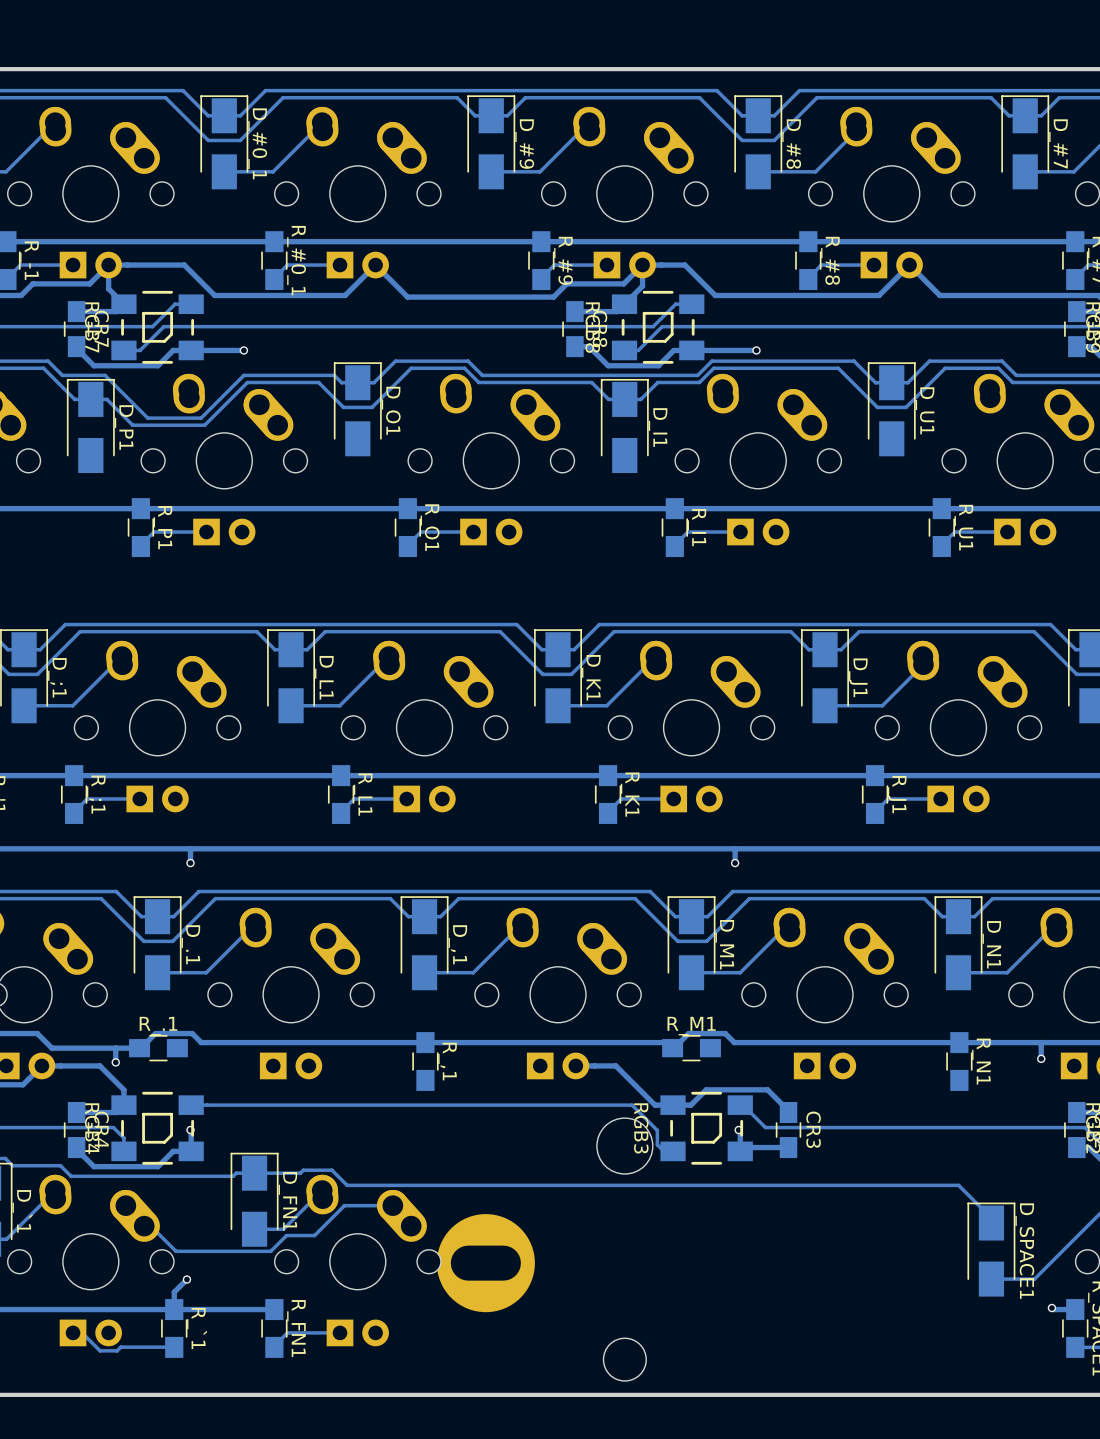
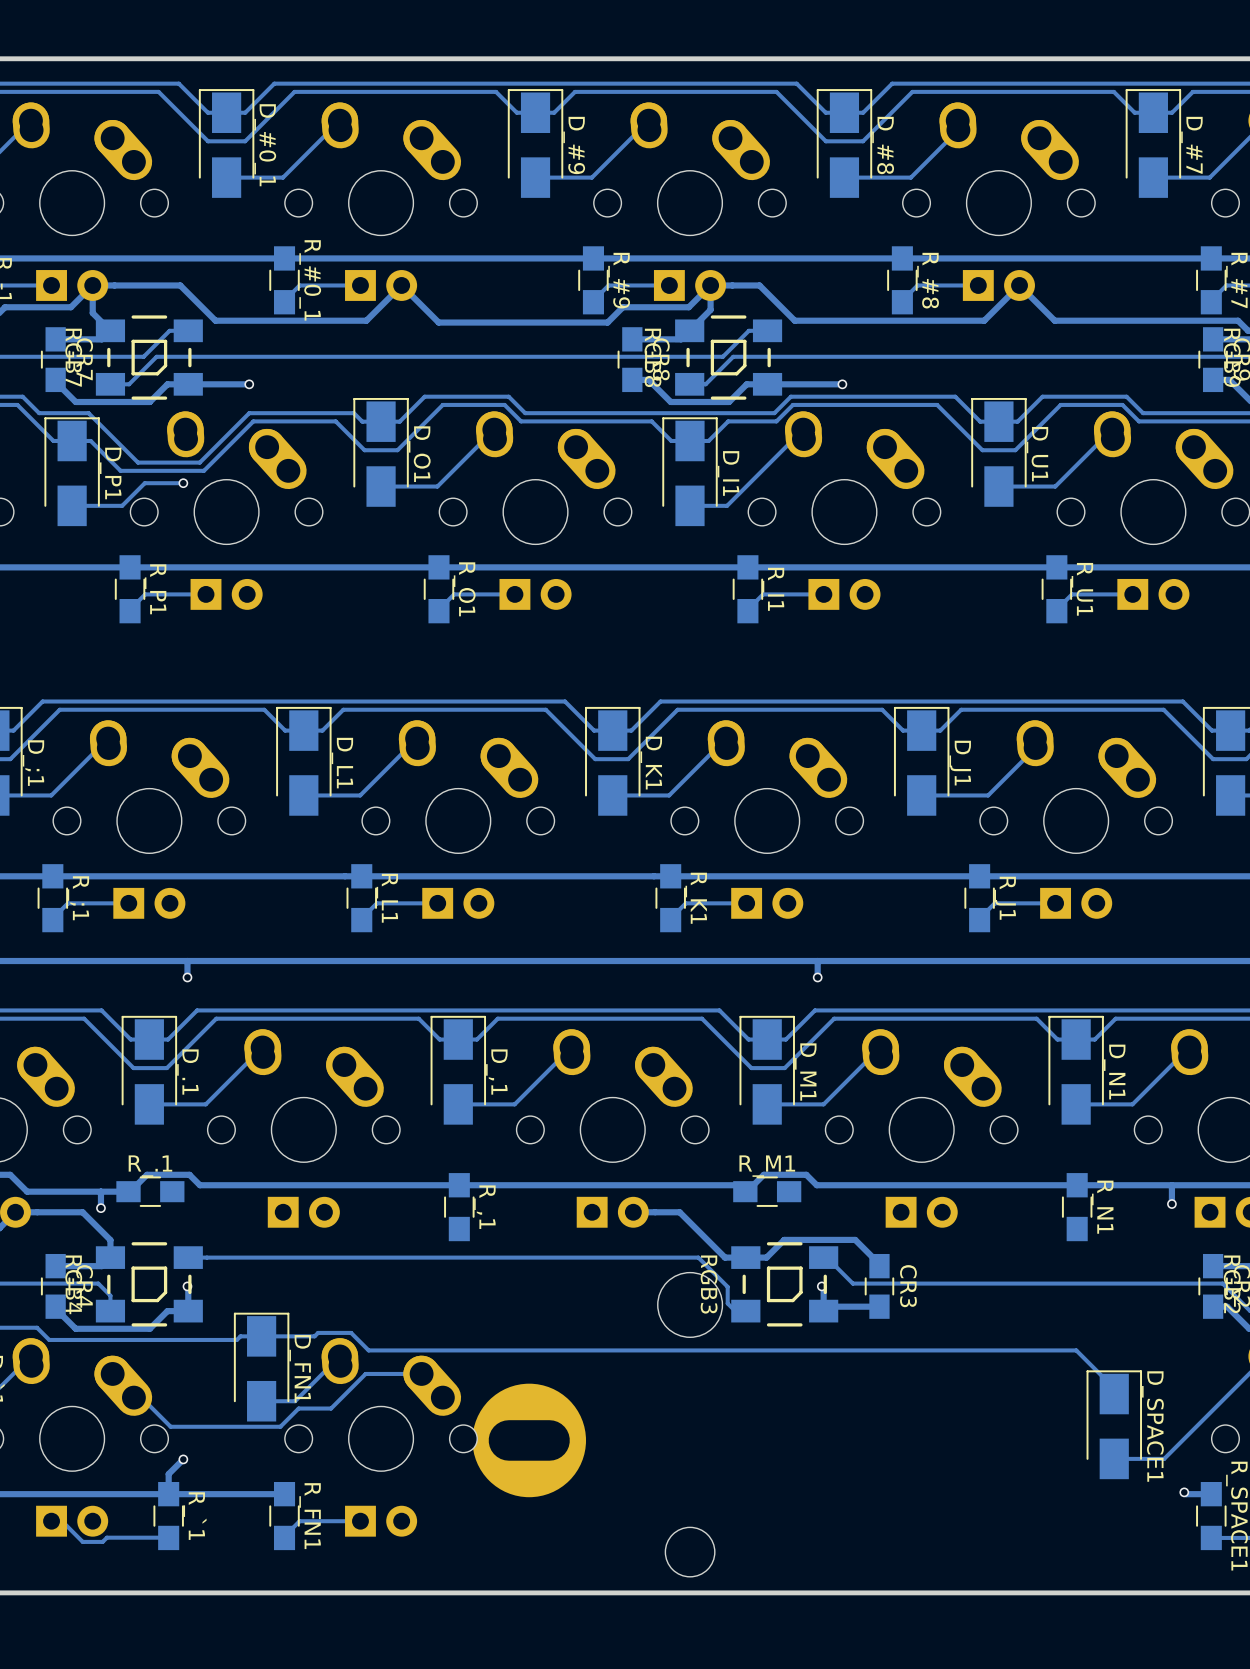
track: none -> (494, 429) (437, 486) (381, 486)
track: none -> (803, 429) (727, 505) (689, 505)
track: none -> (1112, 429) (1055, 486) (998, 486)
track: none -> (183, 483) (144, 483) (122, 505) (72, 505)
via: none -> (183, 483)

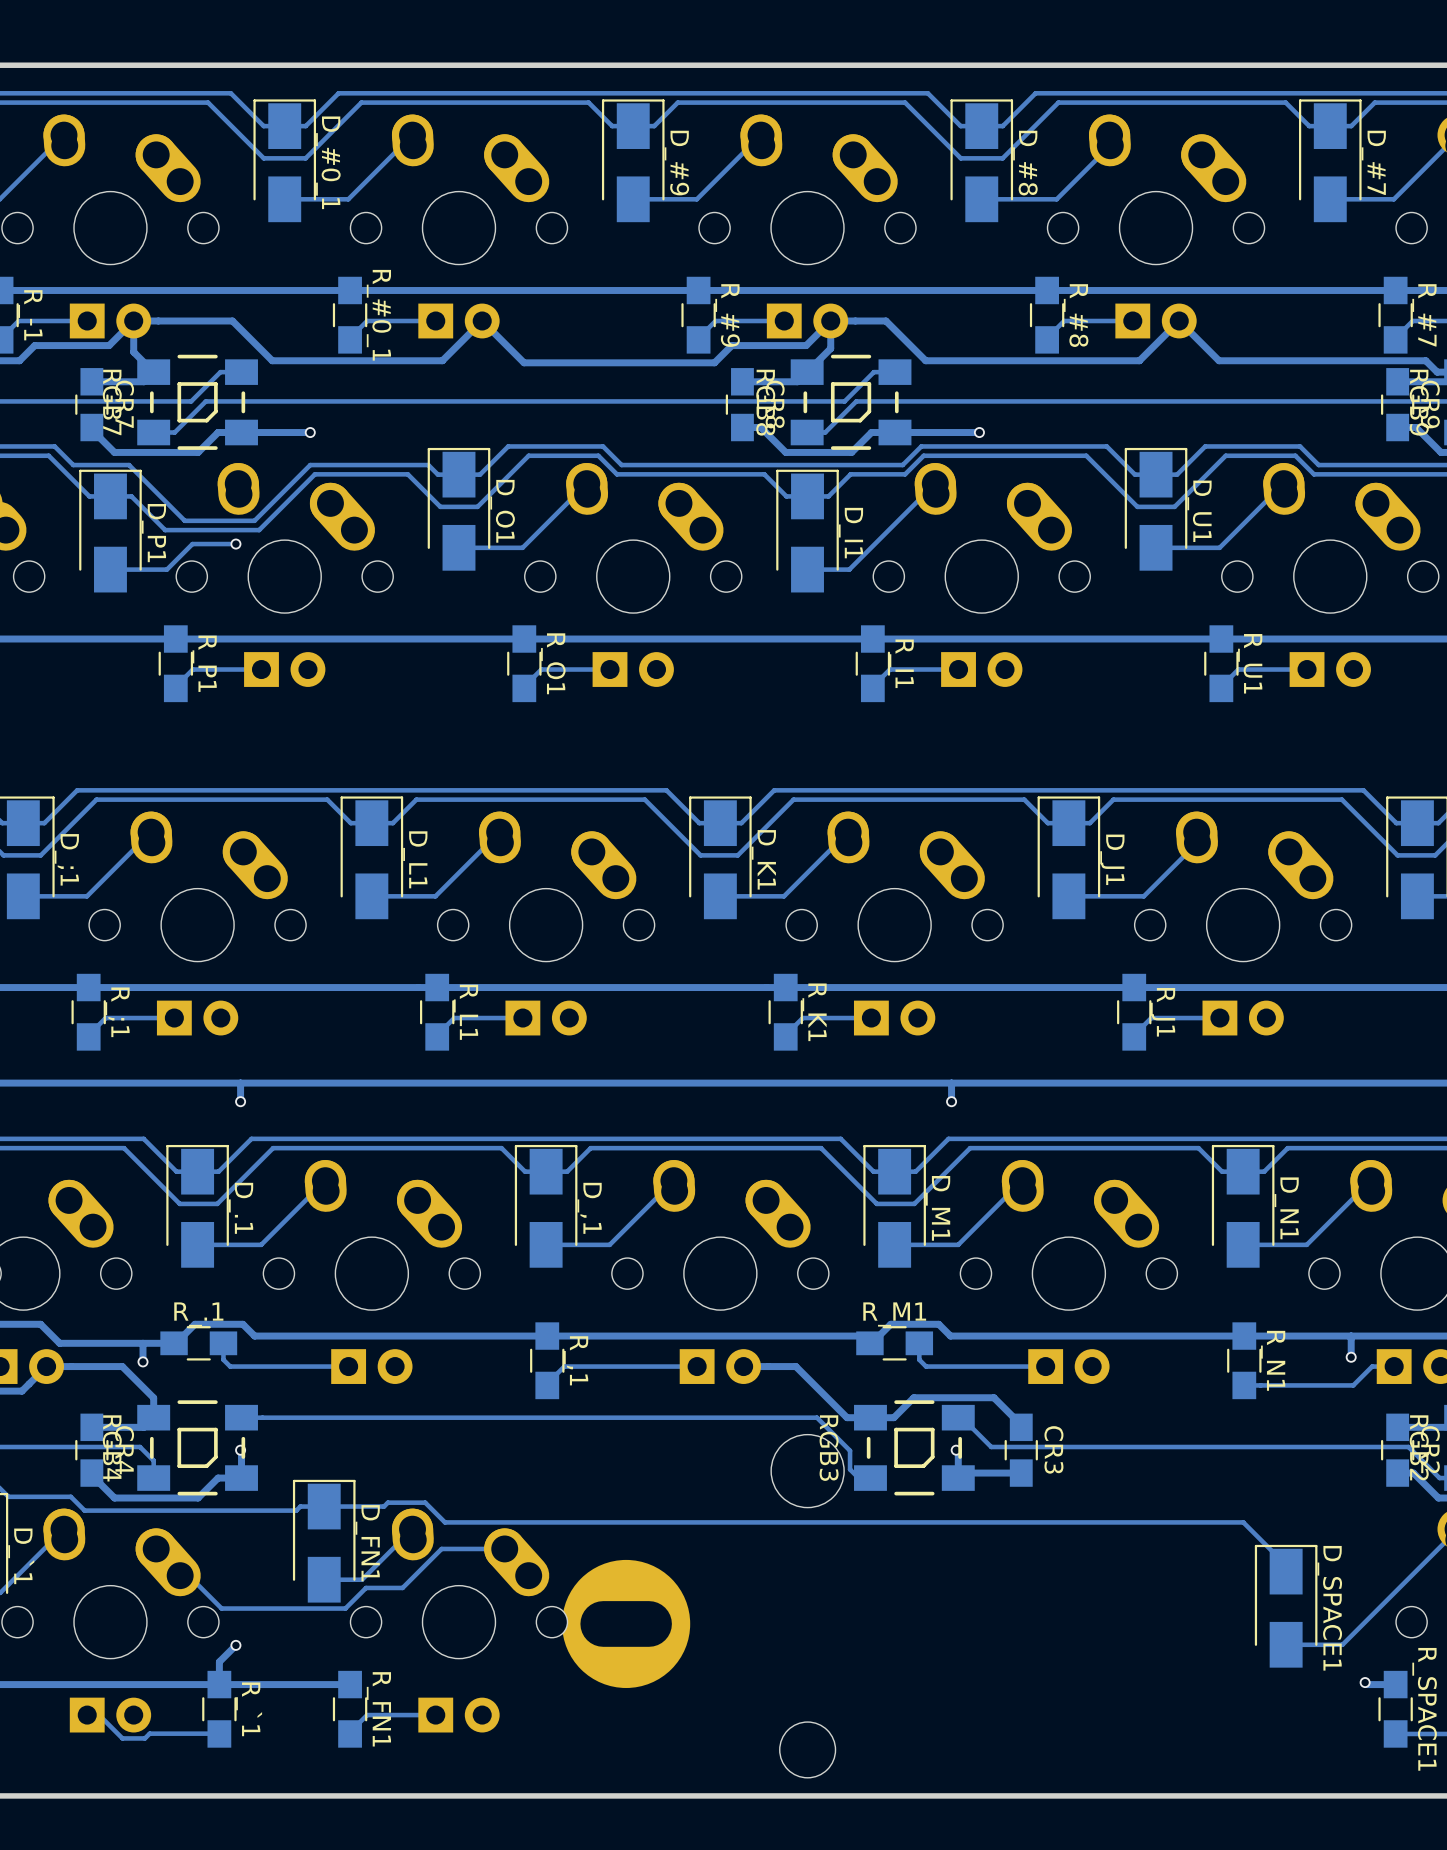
track: none -> (223, 1343) (223, 1359) (230, 1366) (348, 1366)
track: none -> (919, 1343) (919, 1359) (926, 1366) (1045, 1366)
track: none -> (697, 1366) (564, 1366) (547, 1385)
track: none -> (1394, 1366) (1372, 1366) (1353, 1385) (1244, 1385)

